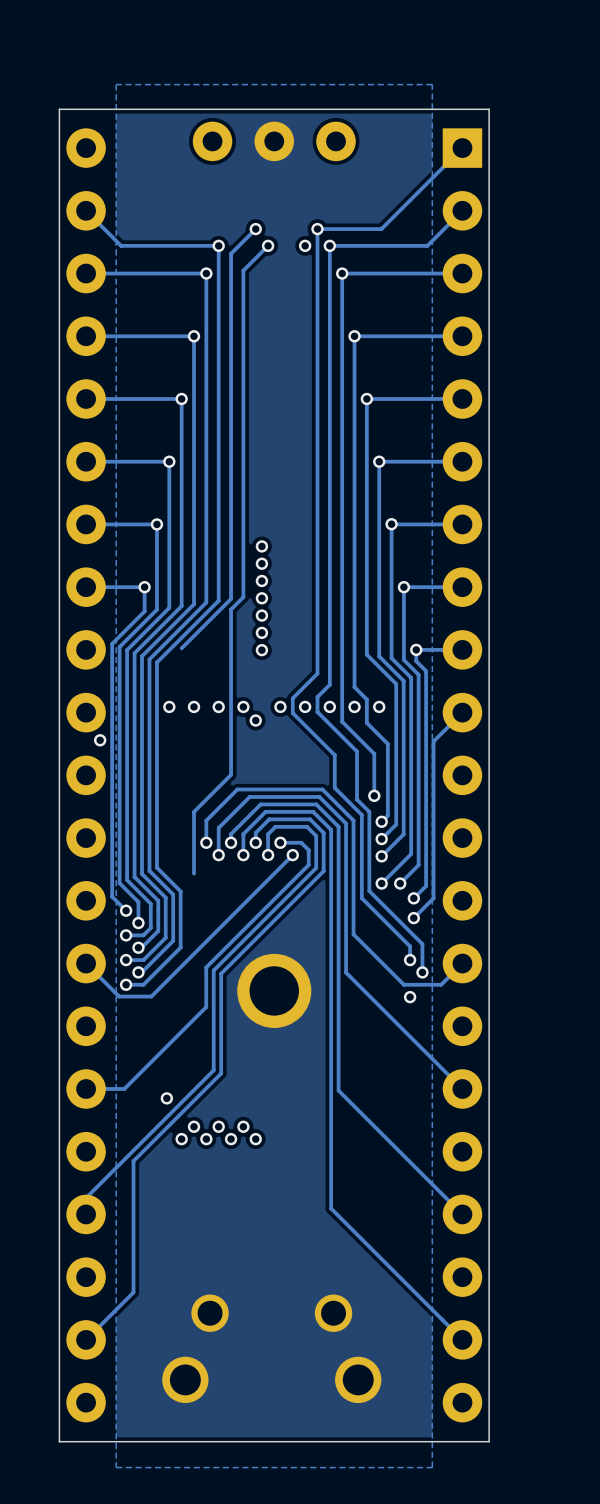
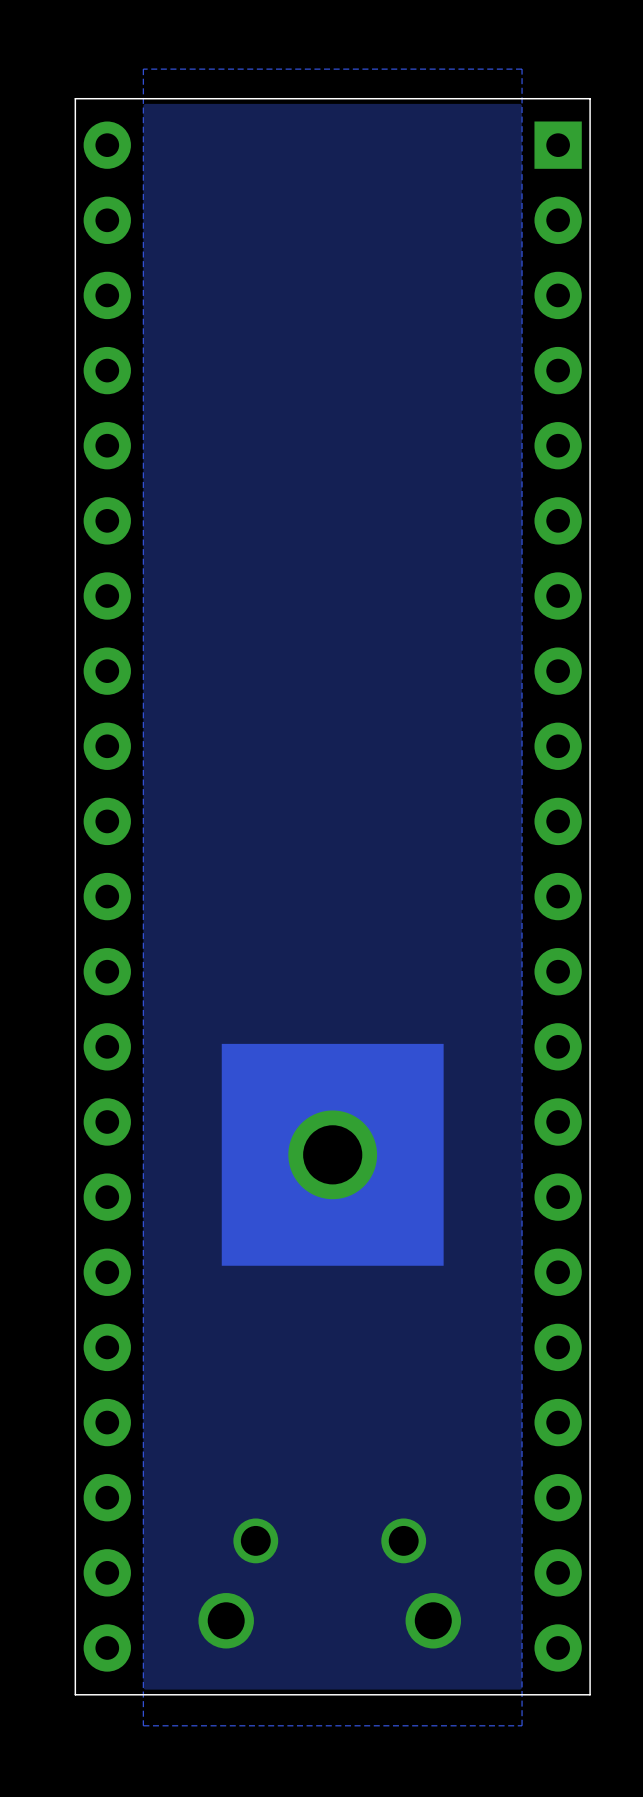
part: (274, 141) -> none
track: (462, 148) (381, 229) (317, 229) (317, 673) (292, 698) (292, 713) (334, 755) (334, 787) (361, 814) (361, 898) (410, 946) (410, 960) -> none
track: (86, 210) (121, 245) (218, 245) (218, 600) (156, 662) (156, 867) (180, 891) (180, 947) (143, 984) (126, 984) -> none
track: (462, 210) (427, 245) (329, 245) (329, 684) (317, 697) (317, 712) (357, 751) (357, 799) (369, 811) (369, 891) (422, 944) (422, 972) -> none
track: (255, 229) (231, 253) (231, 598) (181, 648) -> none
via: (255, 229) -> none
via: (317, 229) -> none
via: (218, 245) -> none
track: (268, 245) (243, 270) (243, 597) (231, 609) (231, 774) (194, 811) (194, 873) -> none
via: (268, 245) -> none
via: (305, 245) -> none
via: (329, 245) -> none
track: (86, 273) (206, 273) (206, 602) (149, 659) (149, 870) (173, 894) (173, 940) (141, 972) (138, 972) -> none
via: (206, 273) -> none
via: (342, 273) -> none
track: (462, 273) (342, 273) (342, 721) (374, 753) (374, 795) -> none
track: (86, 336) (194, 336) (194, 604) (142, 656) (142, 873) (165, 897) (165, 937) (143, 960) (126, 960) -> none
via: (194, 336) -> none
via: (354, 336) -> none
track: (462, 336) (354, 336) (354, 687) (366, 699) (366, 722) (387, 743) (387, 815) (381, 821) -> none
track: (86, 398) (181, 398) (181, 606) (134, 653) (134, 877) (158, 900) (158, 931) (141, 947) (138, 947) -> none
via: (181, 398) -> none
via: (366, 398) -> none
track: (462, 398) (366, 398) (366, 654) (396, 684) (396, 824) (381, 839) -> none
track: (86, 461) (169, 461) (169, 607) (127, 650) (127, 880) (150, 903) (150, 927) (143, 935) (126, 935) -> none
via: (169, 461) -> none
via: (379, 461) -> none
track: (462, 461) (379, 461) (379, 656) (403, 680) (403, 834) (381, 856) -> none
track: (86, 524) (156, 524) (156, 609) (119, 647) (119, 883) (138, 902) (138, 923) -> none
via: (156, 524) -> none
track: (391, 524) (391, 658) (411, 677) (411, 854) (381, 883) -> none
via: (391, 524) -> none
track: (462, 524) (391, 524) -> none
via: (261, 546) -> none
via: (261, 563) -> none
via: (261, 580) -> none
track: (86, 587) (144, 587) (144, 611) (112, 643) (112, 896) (126, 910) -> none
via: (144, 587) -> none
via: (403, 587) -> none
track: (462, 587) (403, 587) (403, 660) (418, 674) (418, 865) (400, 883) -> none
via: (261, 598) -> none
via: (261, 615) -> none
via: (261, 632) -> none
via: (416, 649) -> none
track: (462, 649) (416, 649) (416, 661) (426, 671) (426, 886) (413, 898) -> none
via: (261, 650) -> none
via: (169, 706) -> none
via: (194, 706) -> none
via: (218, 706) -> none
via: (243, 706) -> none
via: (280, 706) -> none
via: (305, 706) -> none
via: (329, 706) -> none
via: (354, 706) -> none
via: (379, 706) -> none
track: (462, 712) (433, 741) (433, 898) (413, 918) -> none
via: (255, 720) -> none
via: (100, 740) -> none
via: (374, 795) -> none
via: (381, 821) -> none
via: (381, 839) -> none
track: (206, 842) (206, 820) (237, 789) (322, 789) (353, 820) (353, 934) (403, 984) (441, 984) (462, 963) -> none
via: (206, 842) -> none
track: (231, 842) (231, 834) (260, 804) (316, 804) (338, 826) (338, 1090) (462, 1214) -> none
via: (231, 842) -> none
track: (255, 842) (255, 832) (269, 819) (310, 819) (323, 832) (323, 871) (221, 973) (221, 1073) (133, 1161) (133, 1292) (86, 1339) -> none
via: (255, 842) -> none
track: (280, 842) (301, 842) (308, 850) (308, 864) (206, 967) (206, 1007) (124, 1088) (86, 1088) -> none
via: (280, 842) -> none
track: (218, 855) (218, 827) (249, 796) (319, 796) (346, 823) (346, 972) (462, 1088) -> none
via: (218, 855) -> none
track: (243, 855) (243, 834) (265, 811) (313, 811) (331, 829) (331, 1208) (462, 1339) -> none
via: (243, 855) -> none
track: (268, 855) (268, 834) (275, 826) (307, 826) (316, 835) (316, 868) (213, 970) (213, 1070) (86, 1198) (86, 1214) -> none
via: (268, 855) -> none
track: (292, 855) (151, 996) (119, 996) (86, 963) -> none
via: (292, 855) -> none
via: (381, 856) -> none
via: (381, 883) -> none
via: (400, 883) -> none
via: (413, 898) -> none
via: (126, 910) -> none
via: (413, 918) -> none
via: (138, 923) -> none
via: (126, 935) -> none
via: (138, 947) -> none
part footprint: [237, 953, 312, 1028] -> [221, 1043, 444, 1266]
via: (126, 960) -> none
via: (410, 960) -> none
via: (138, 972) -> none
via: (422, 972) -> none
via: (126, 984) -> none
via: (410, 997) -> none
via: (166, 1098) -> none
via: (194, 1126) -> none
via: (218, 1126) -> none
via: (243, 1126) -> none
via: (181, 1139) -> none
via: (206, 1139) -> none
via: (231, 1139) -> none
via: (255, 1139) -> none

